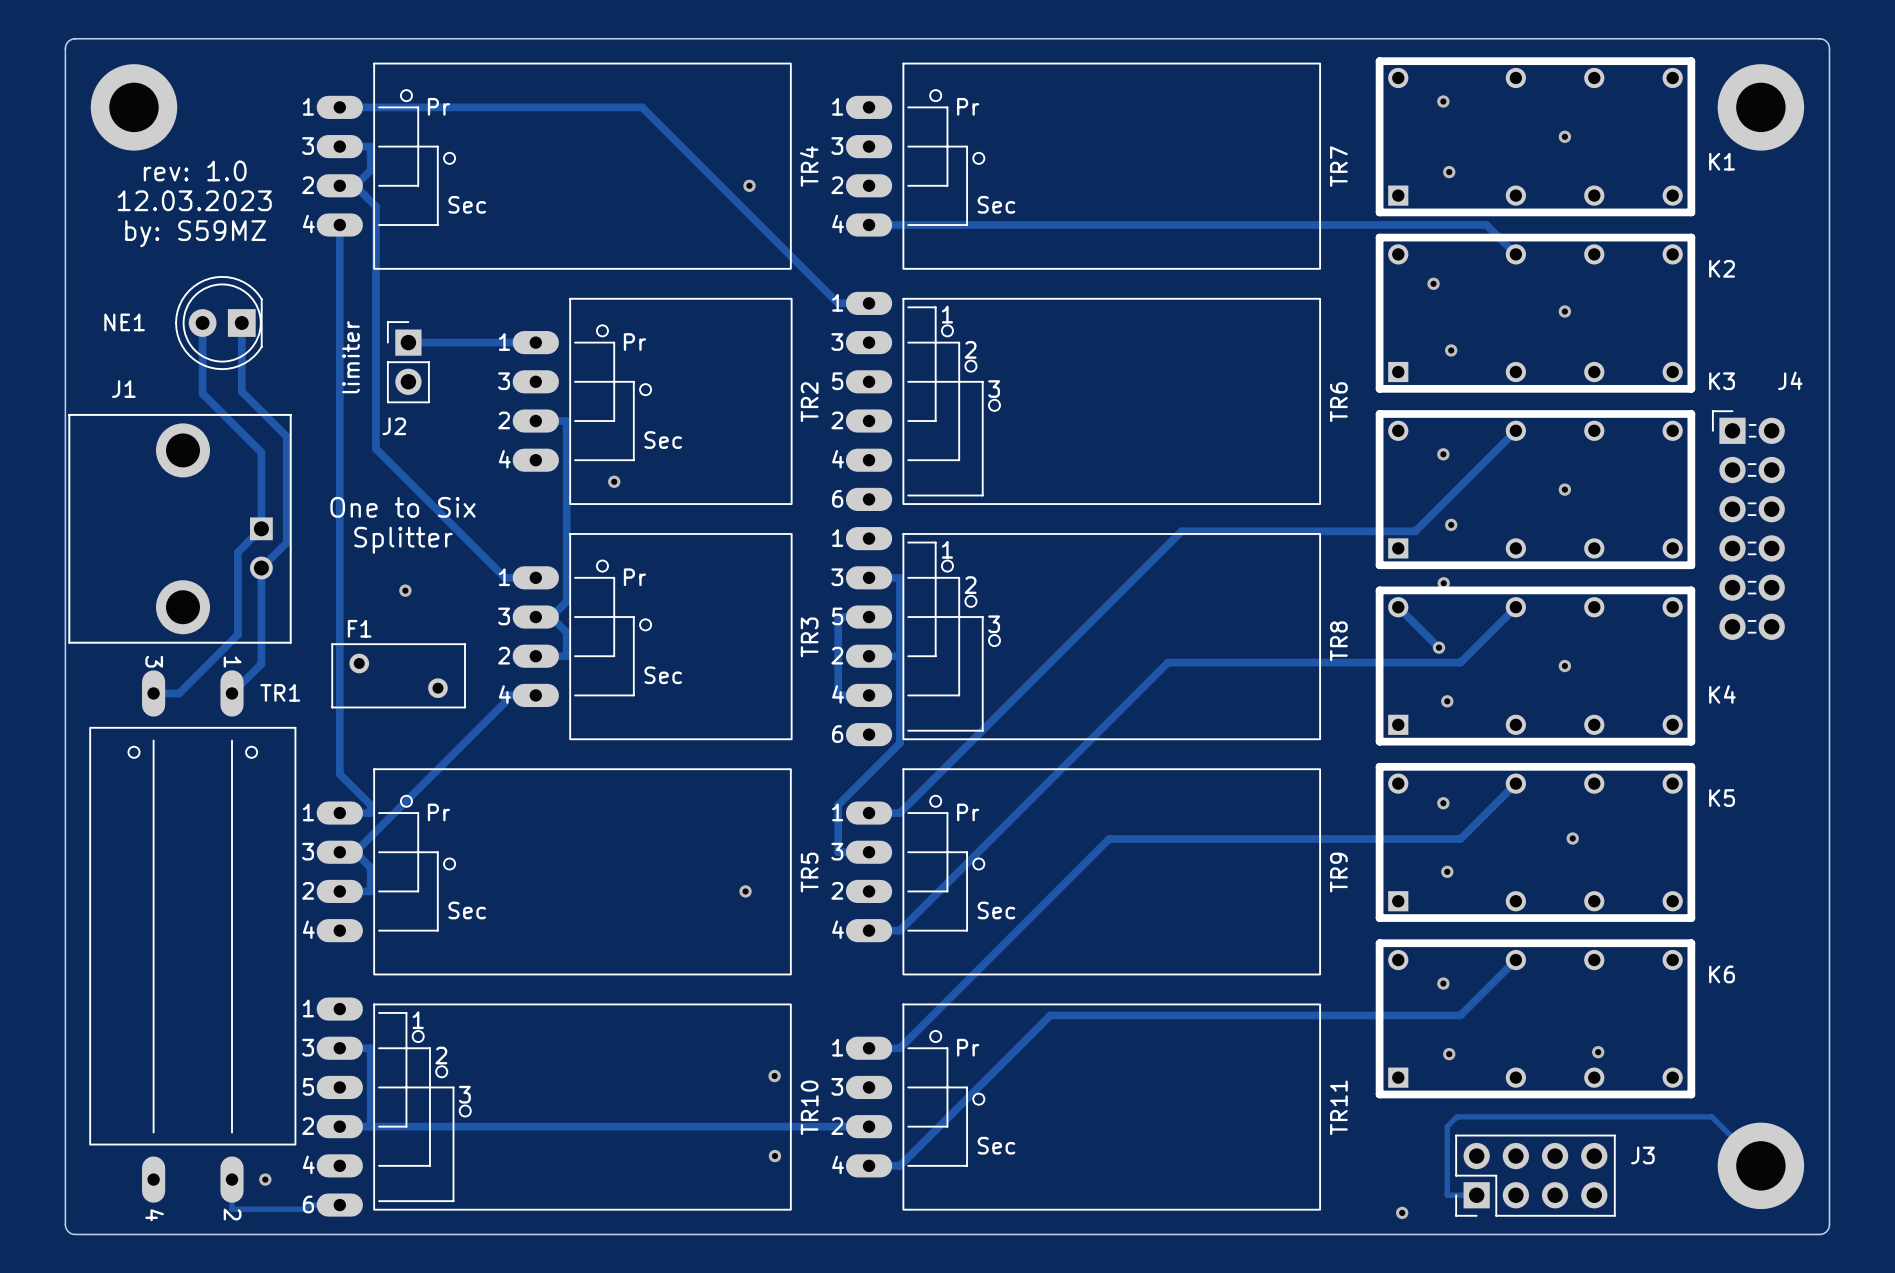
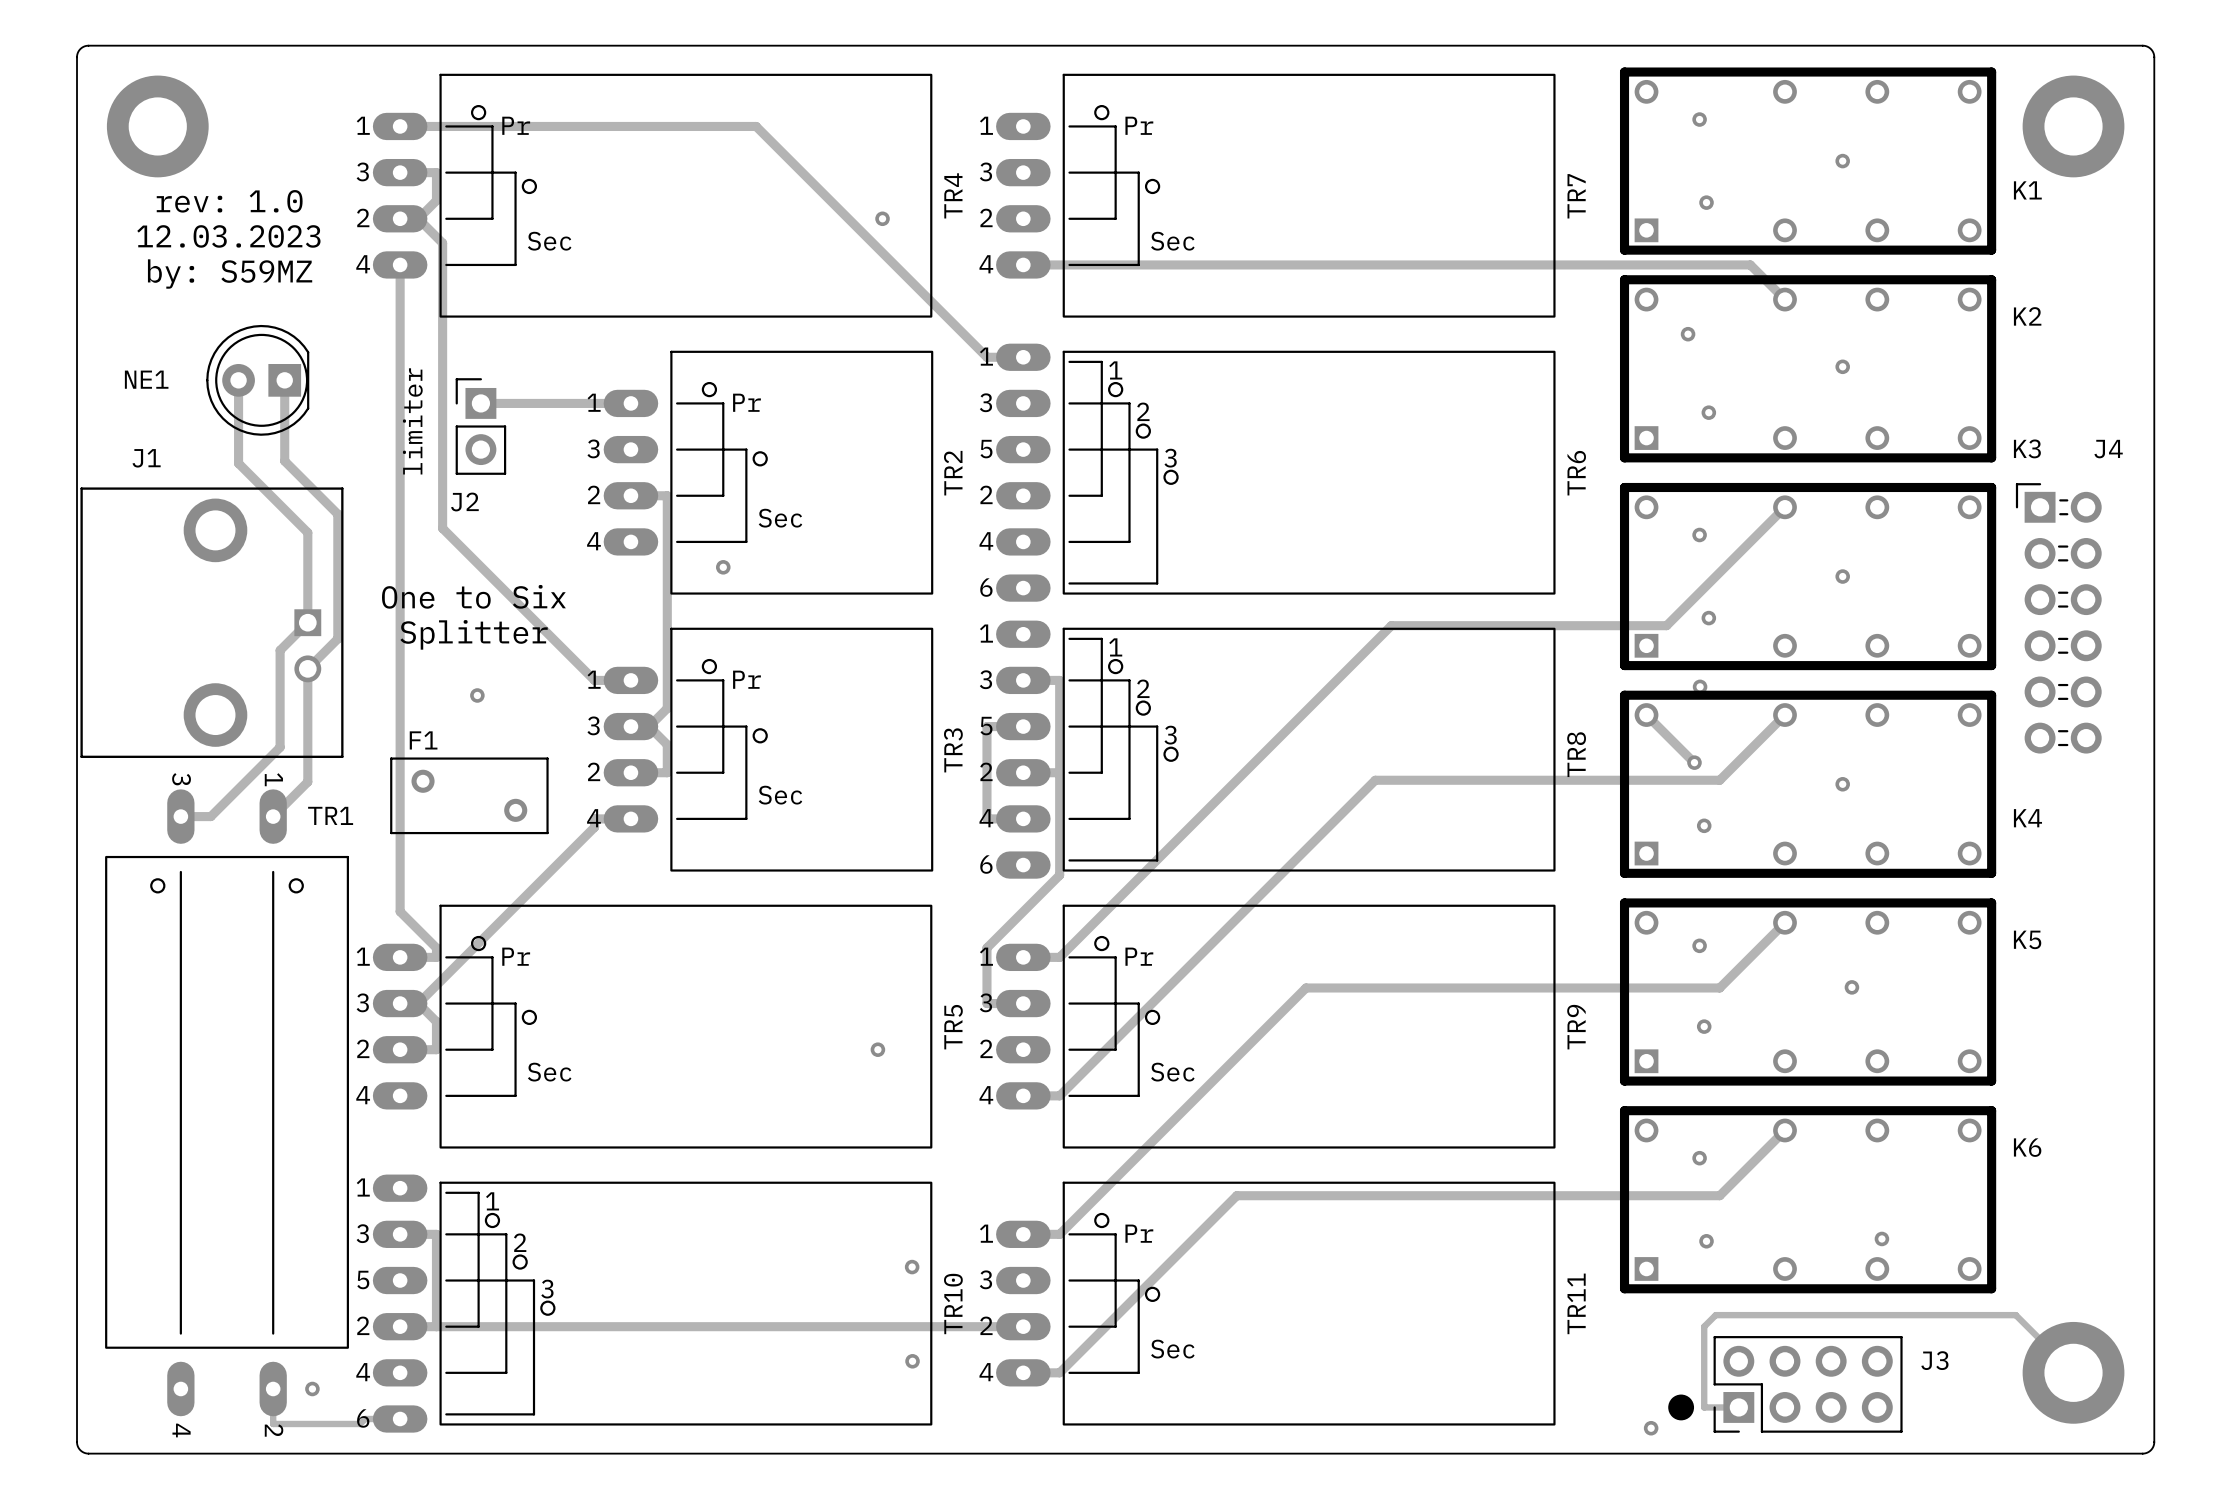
drawing: none -> [1668, 1394, 1695, 1421]

